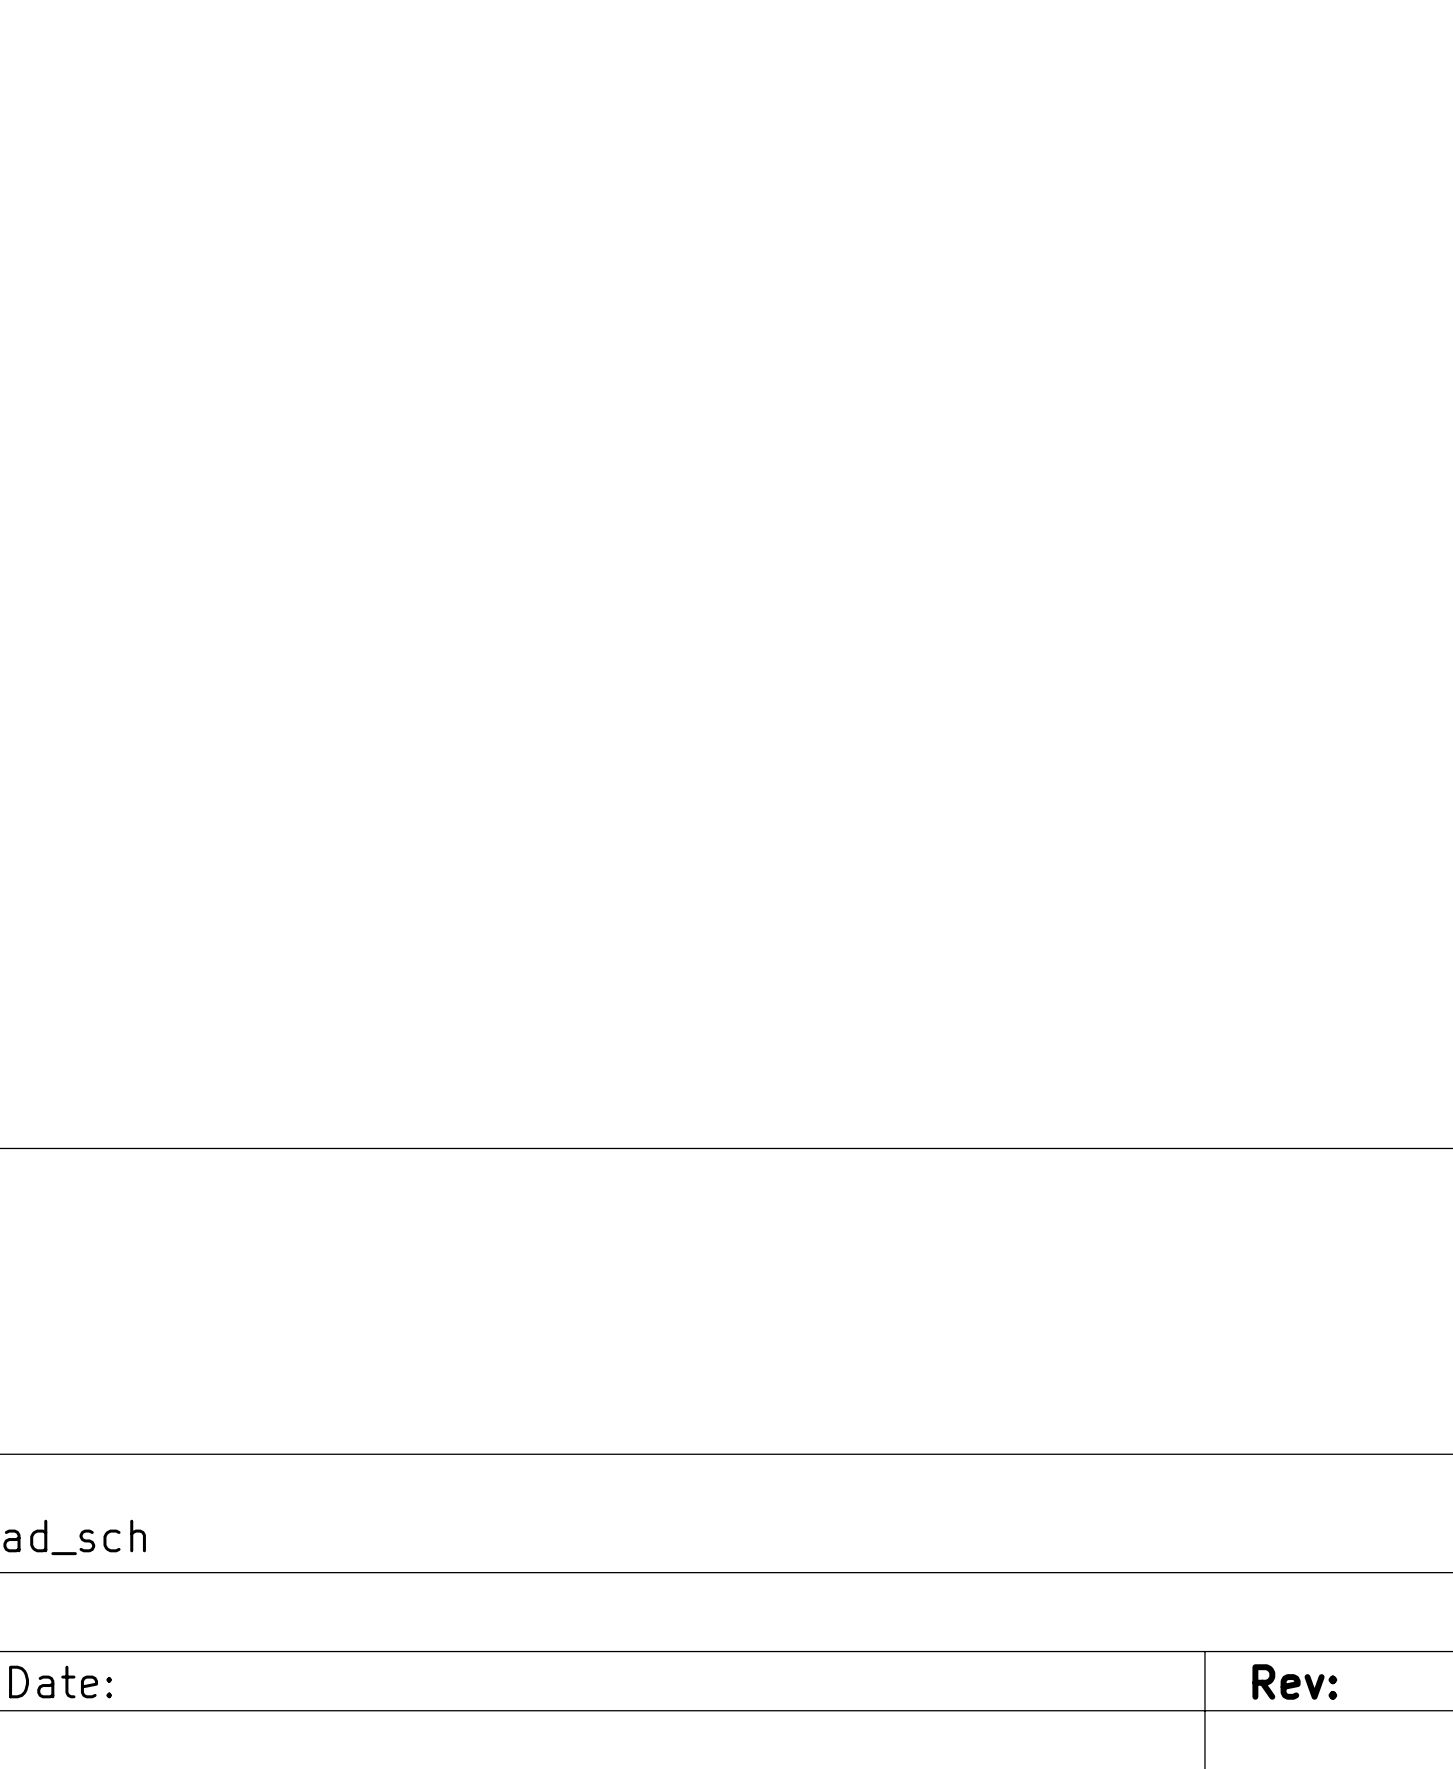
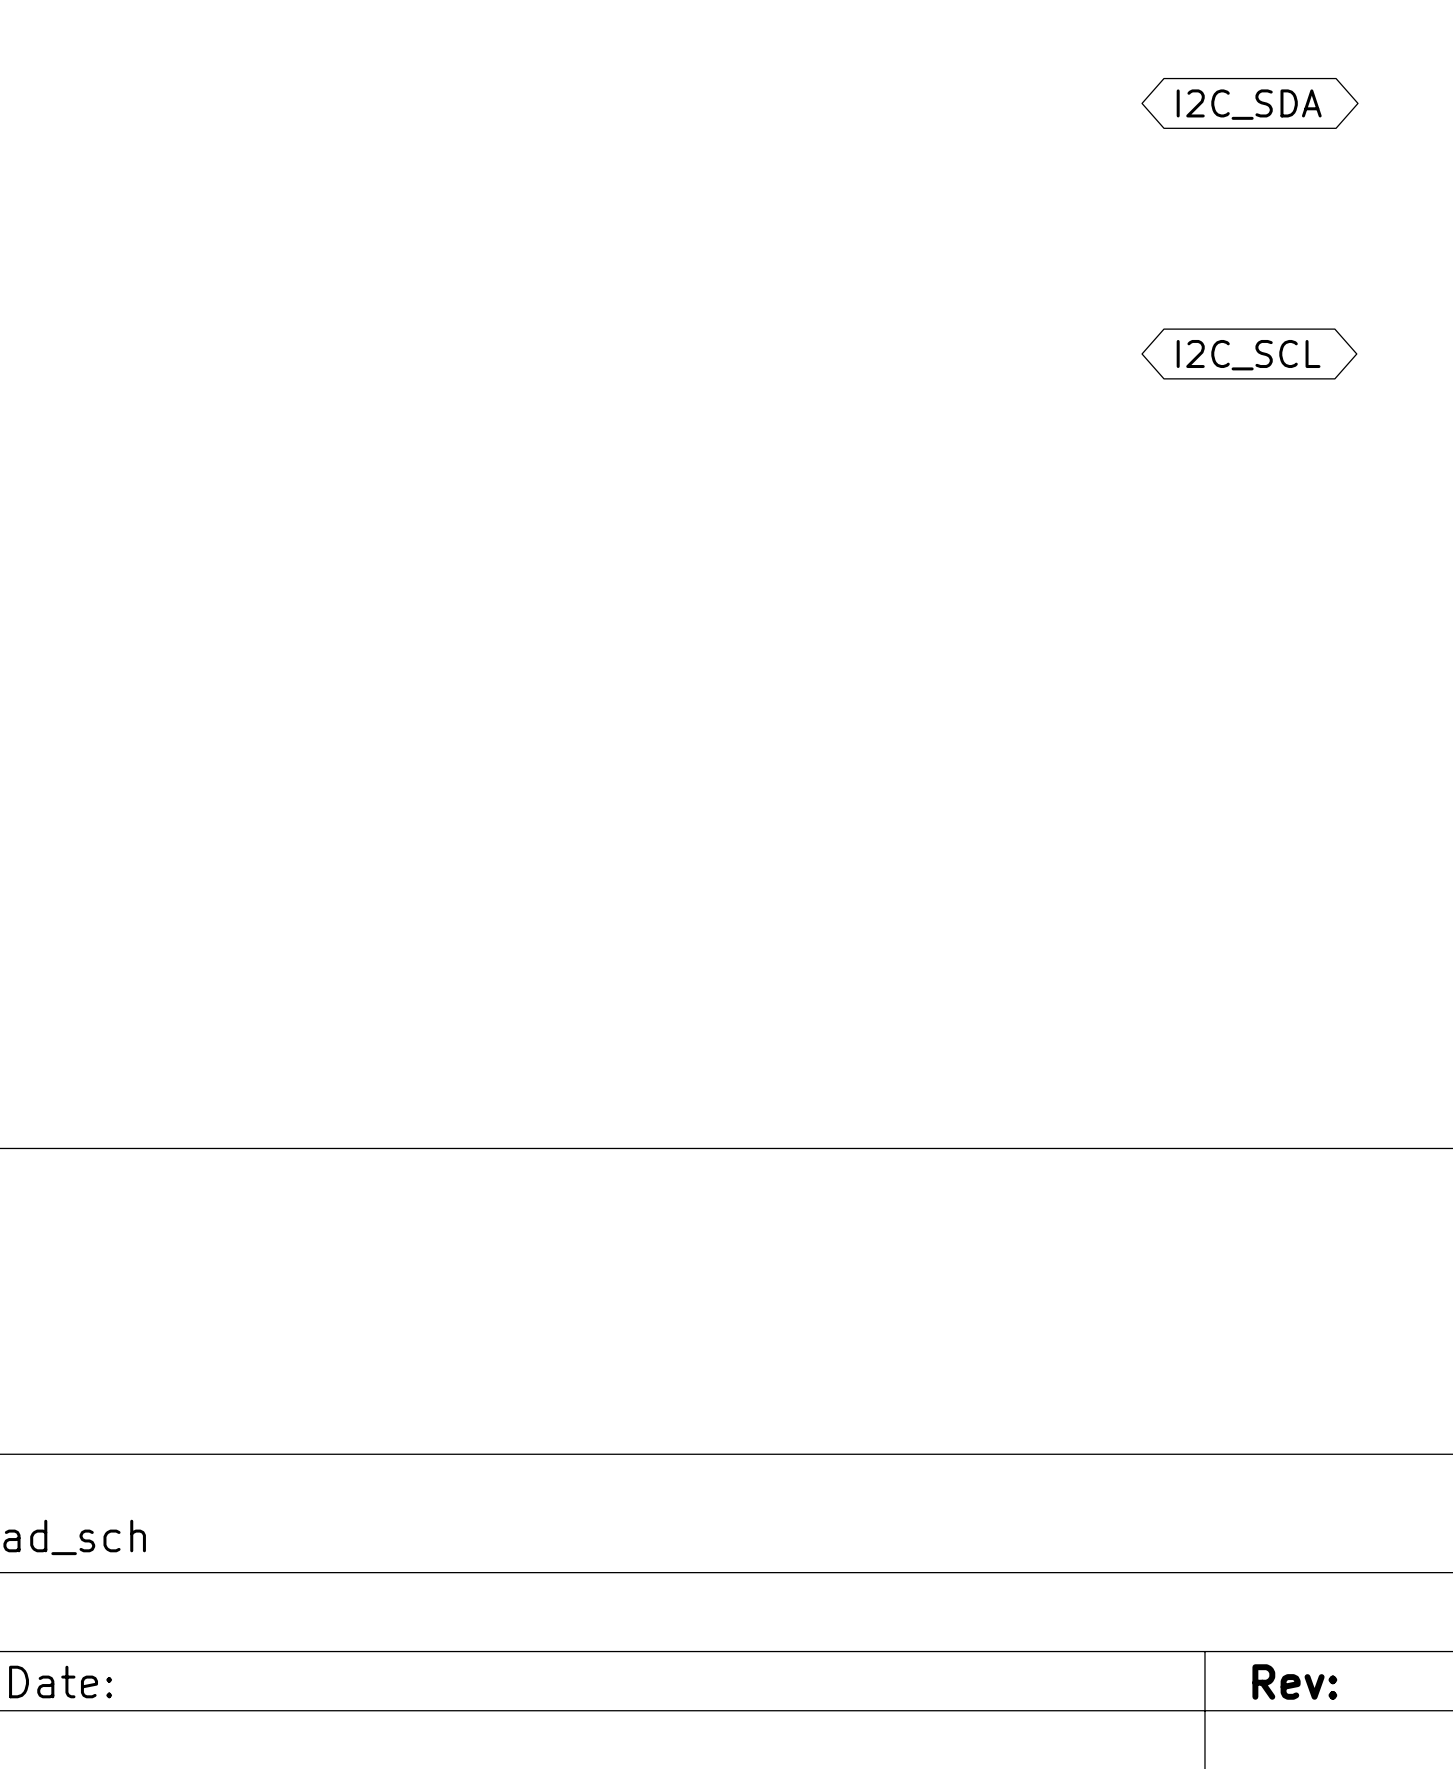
global label: none -> I2C_SDA (1249, 104)
global label: none -> I2C_SCL (1248, 355)

